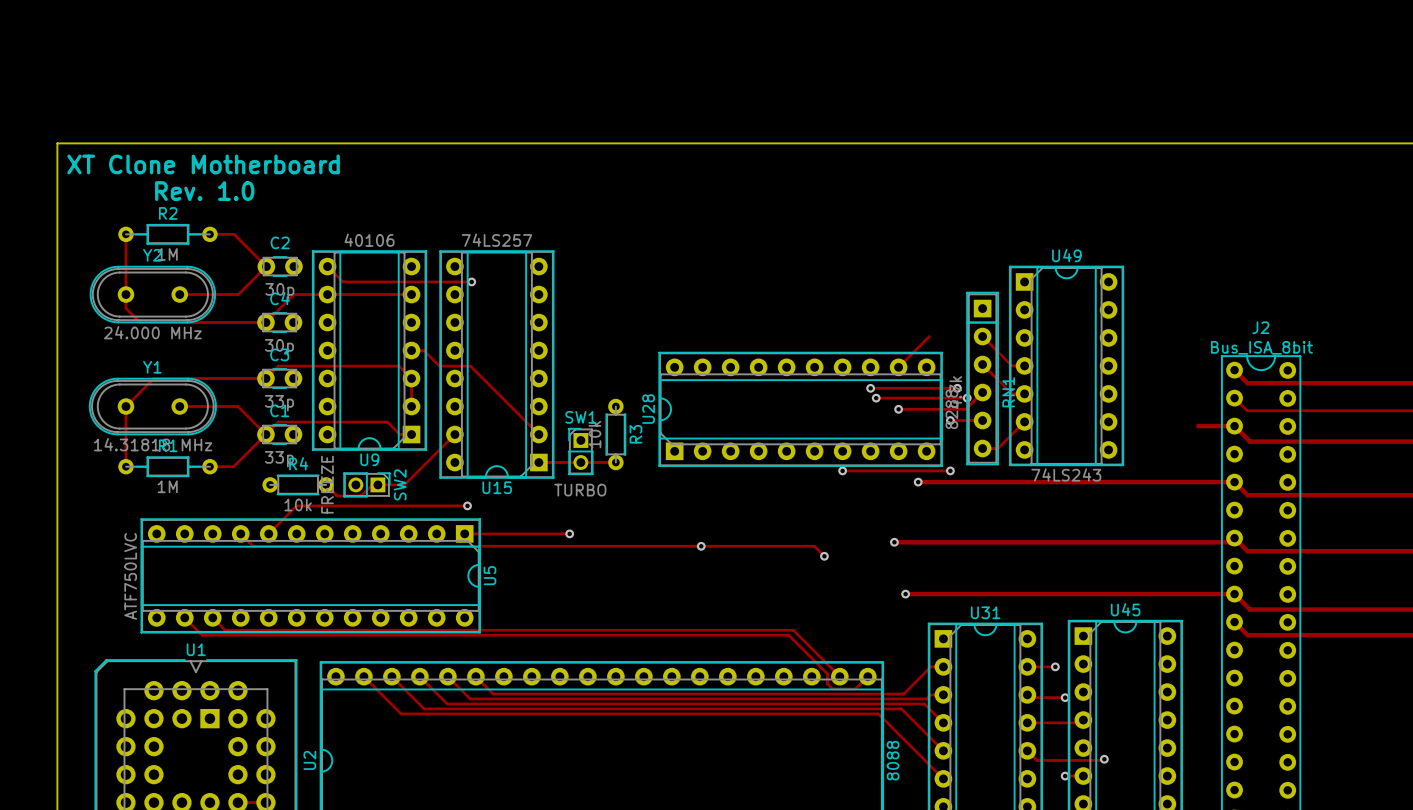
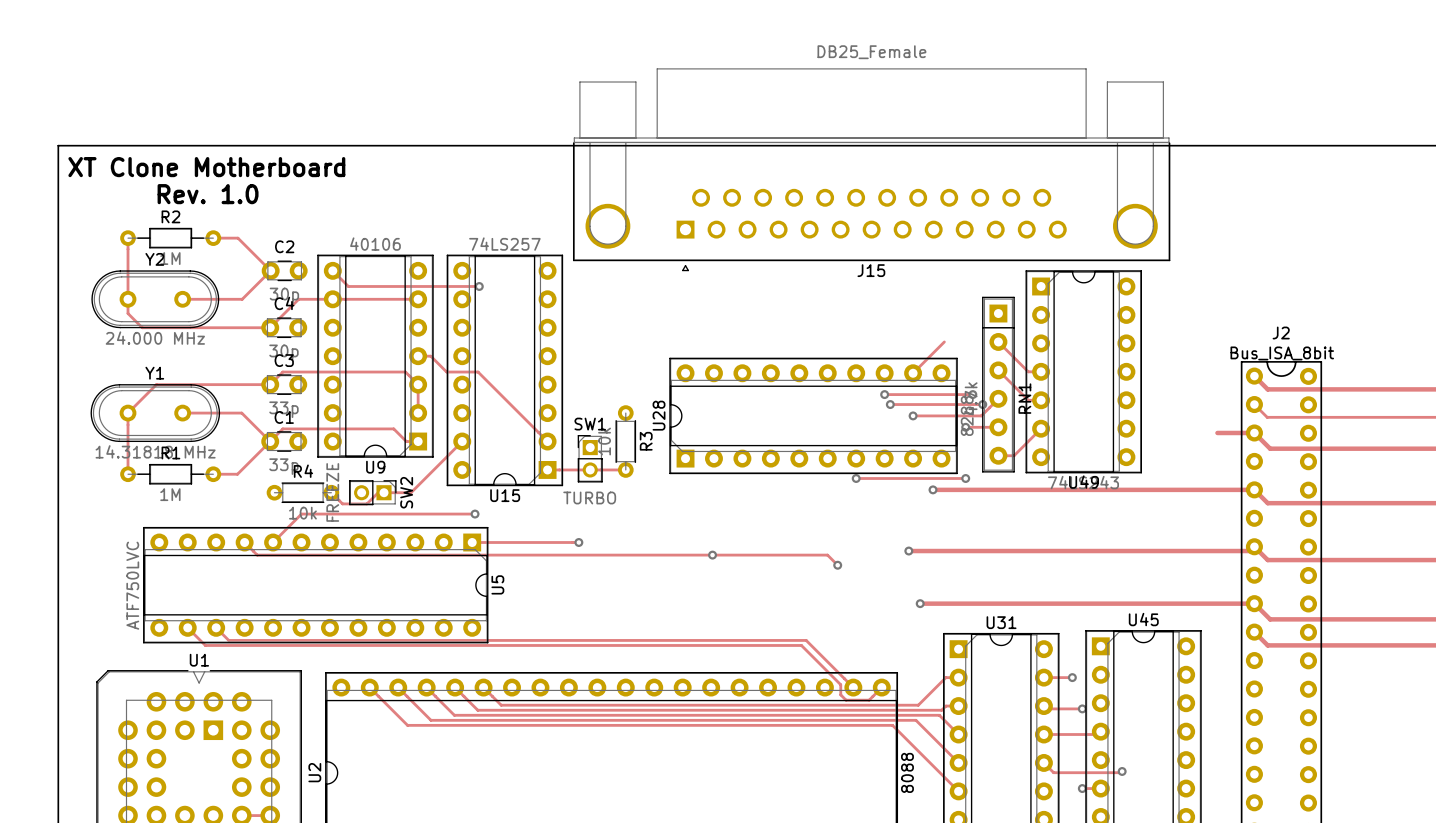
J15: none -> DB25_Female (871, 169)
U49 name position: U49 (1066, 255) -> U49 (1084, 482)

